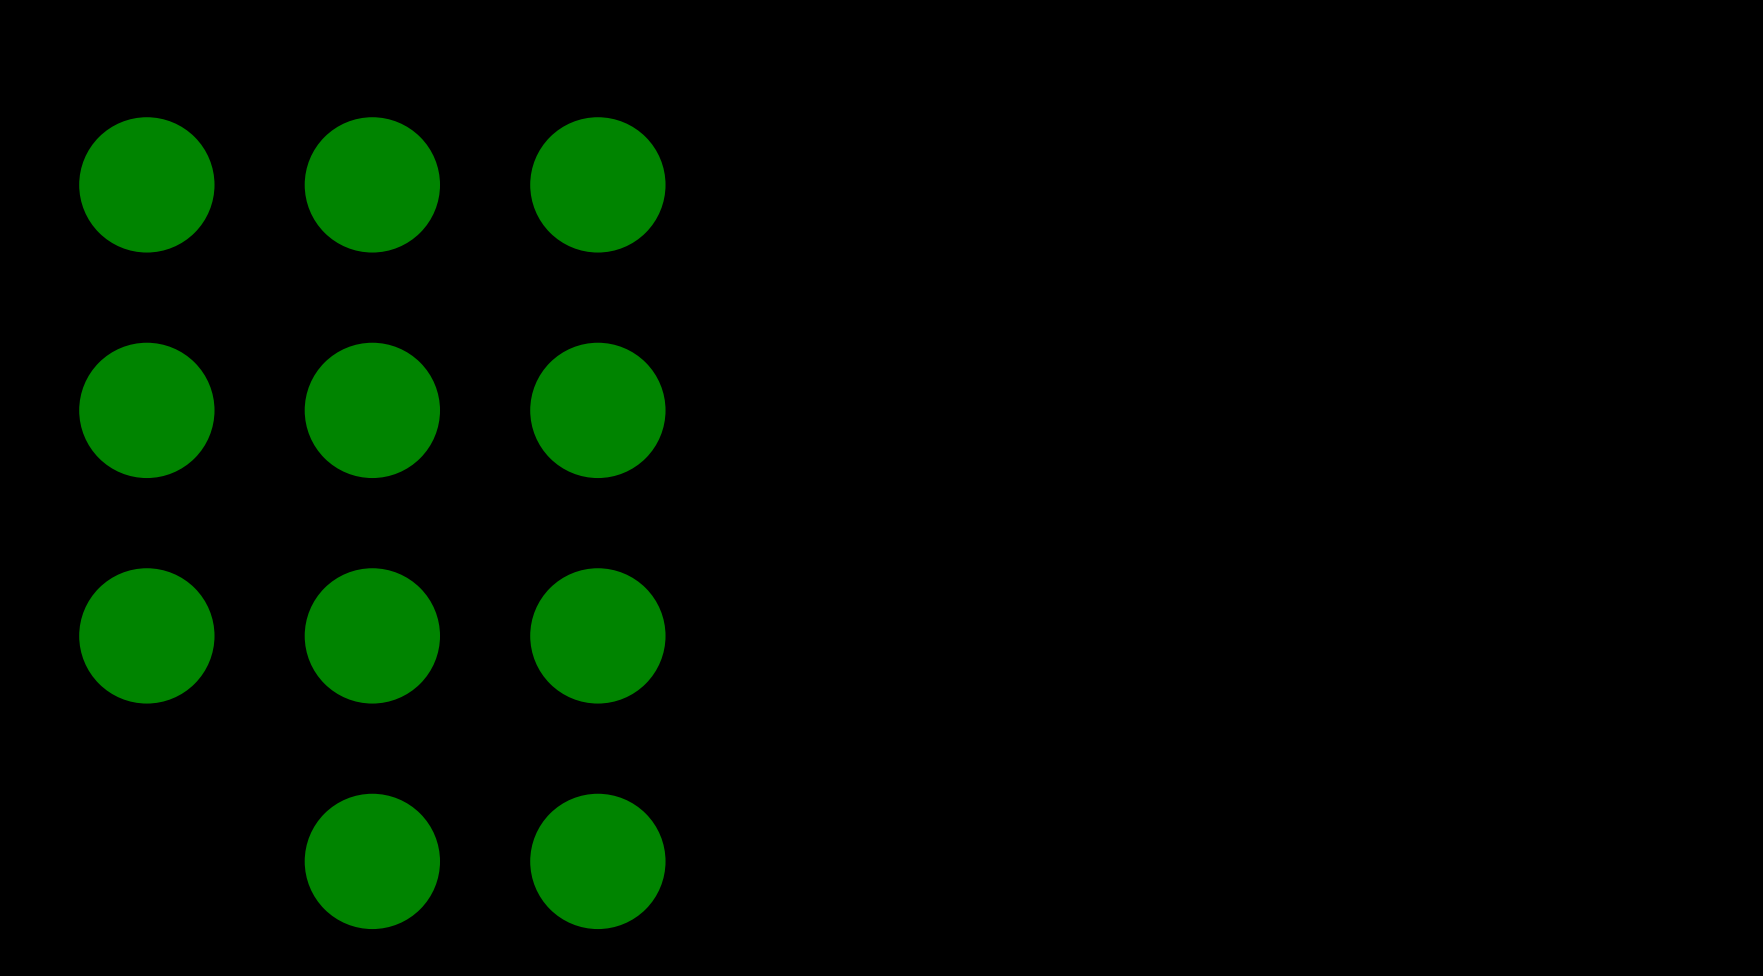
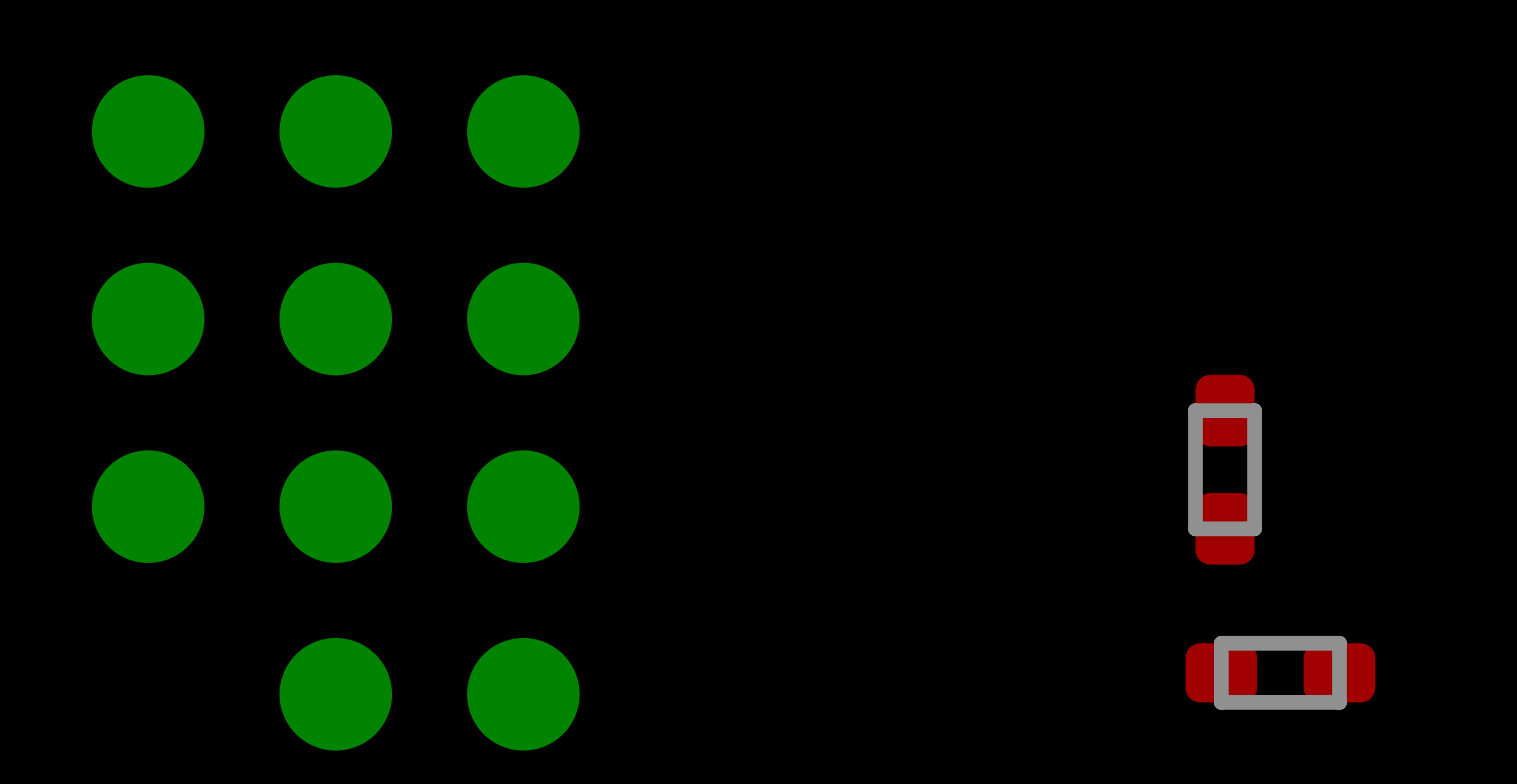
part: none -> (1225, 469)
part: none -> (1280, 672)

